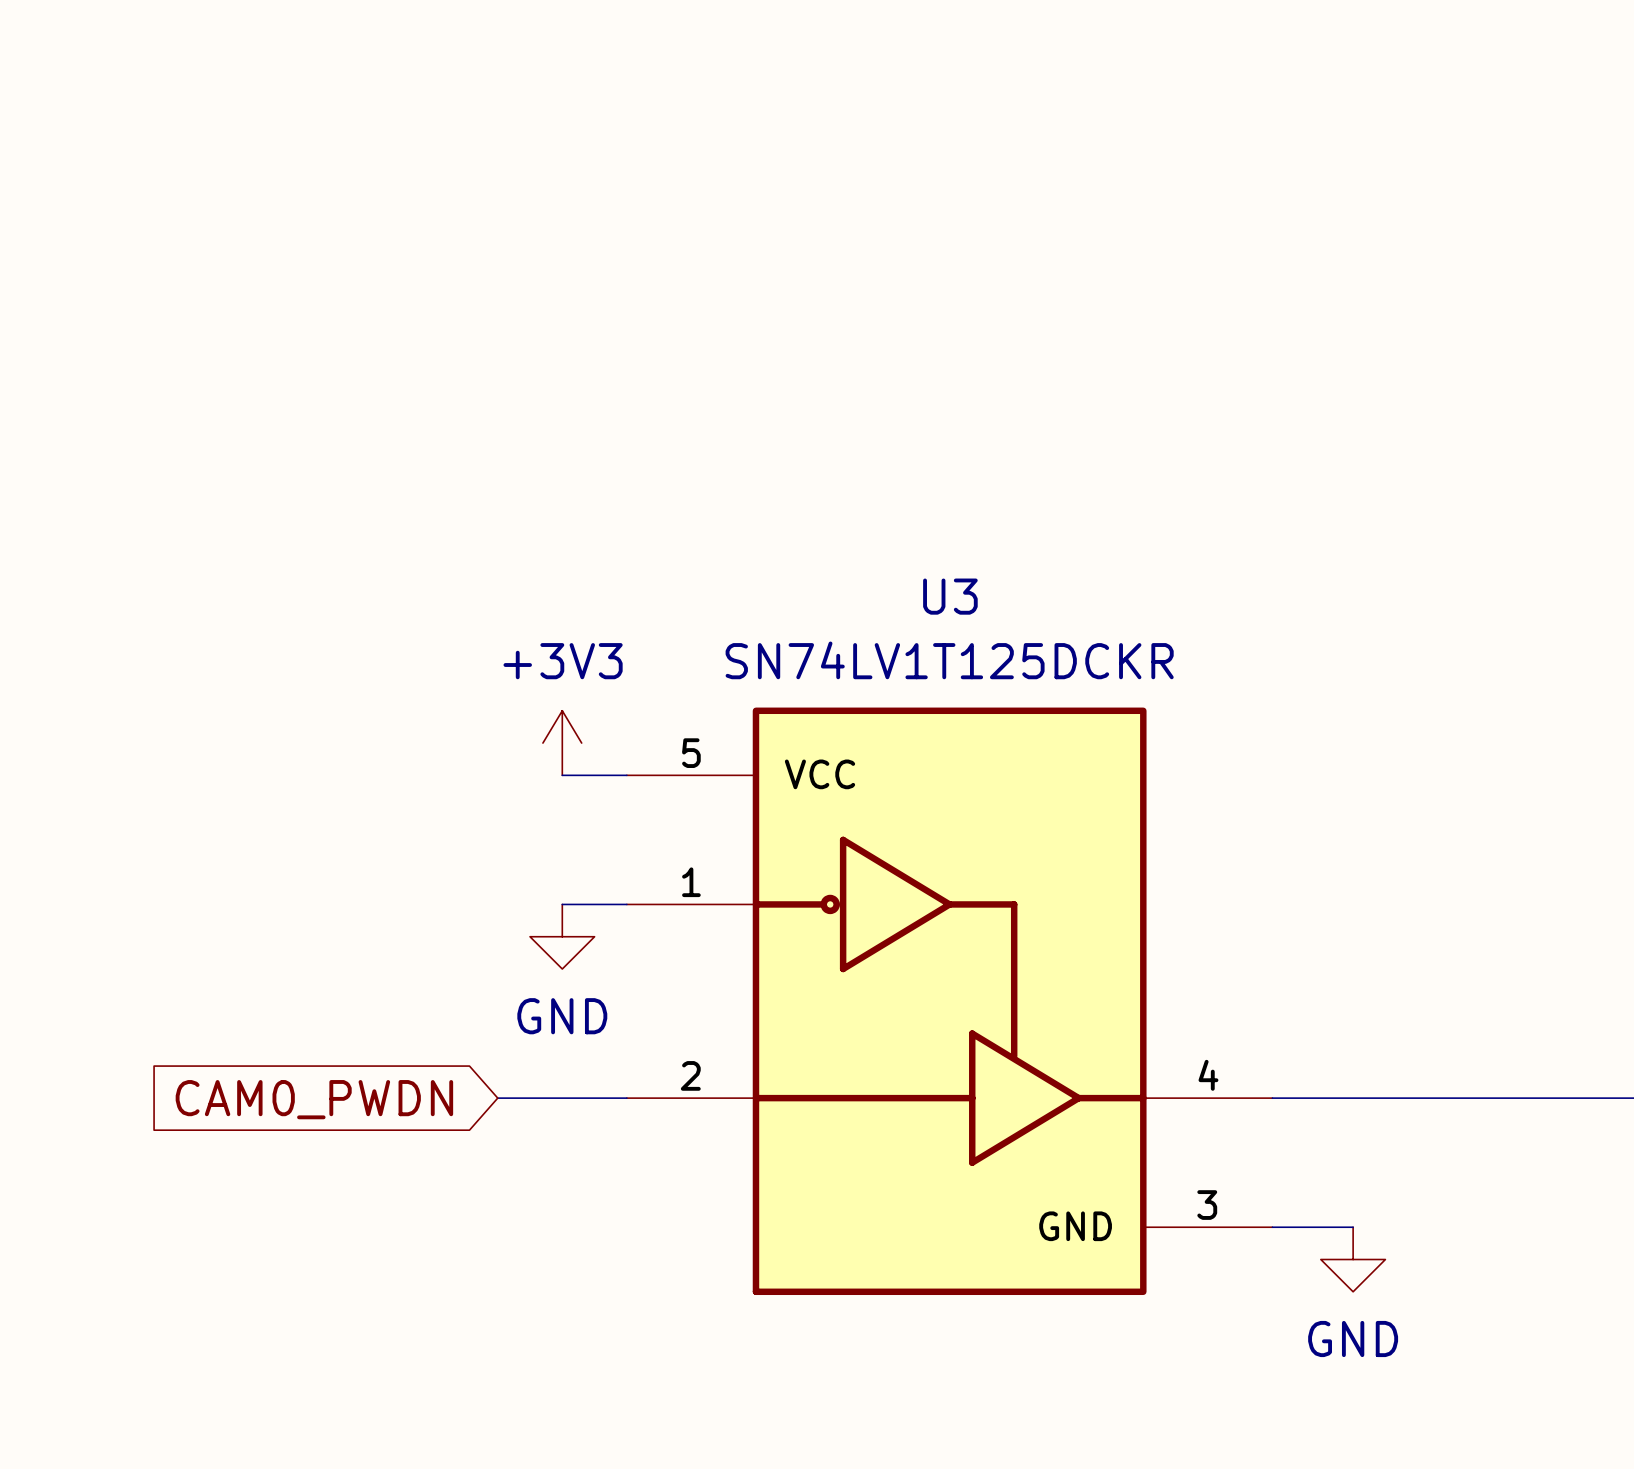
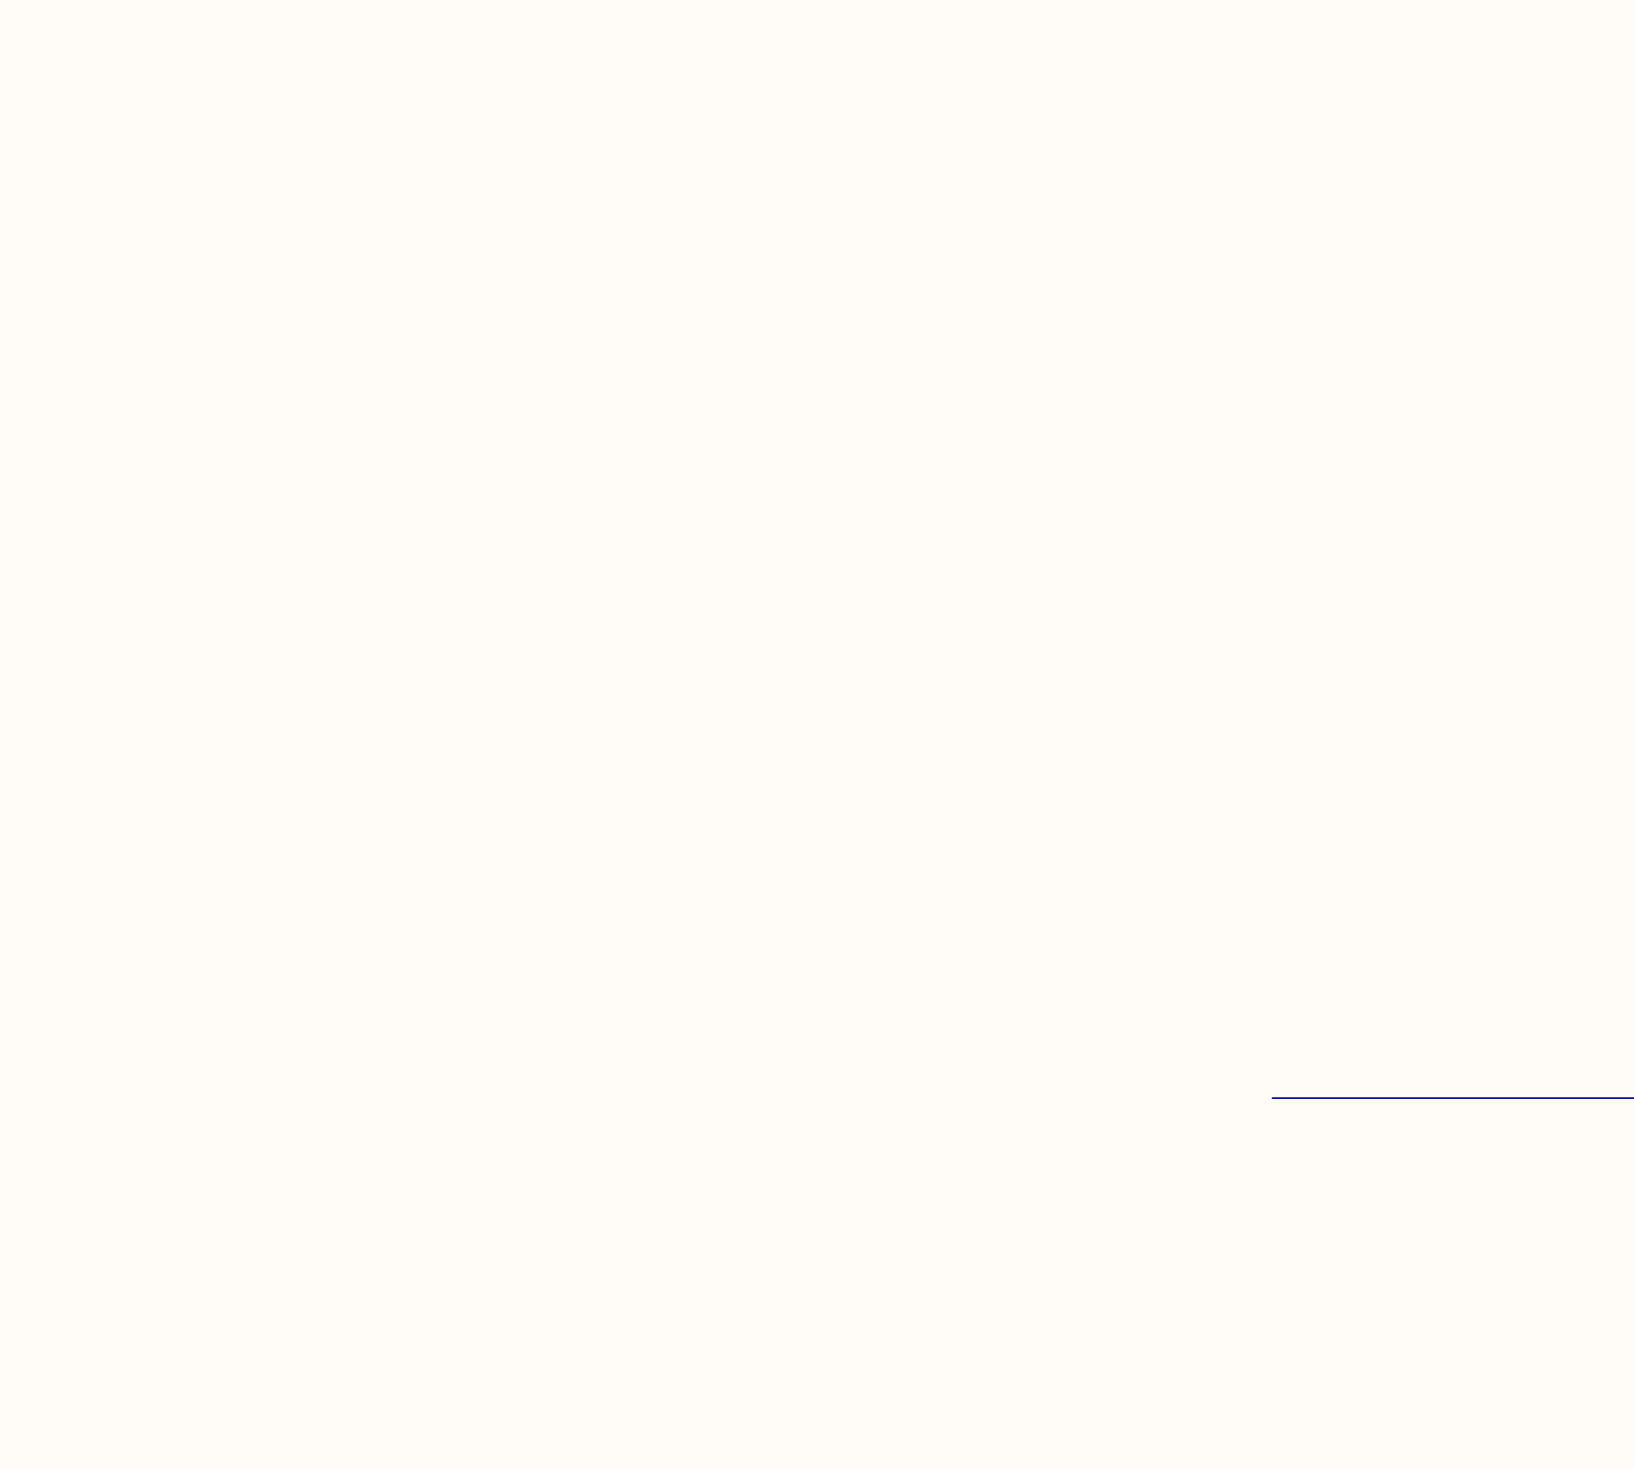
power symbol: +3V3 (562, 743) -> none
wire: (562, 775) (626, 775) -> none
wire: (562, 904) (626, 904) -> none
power symbol: GND (562, 936) -> none
U3: SN74LV1T125DCKR (949, 1001) -> none
wire: (497, 1098) (626, 1098) -> none
global label: CAM0_PWDN (314, 1099) -> none
wire: (1272, 1227) (1353, 1227) -> none
power symbol: GND (1353, 1259) -> none

